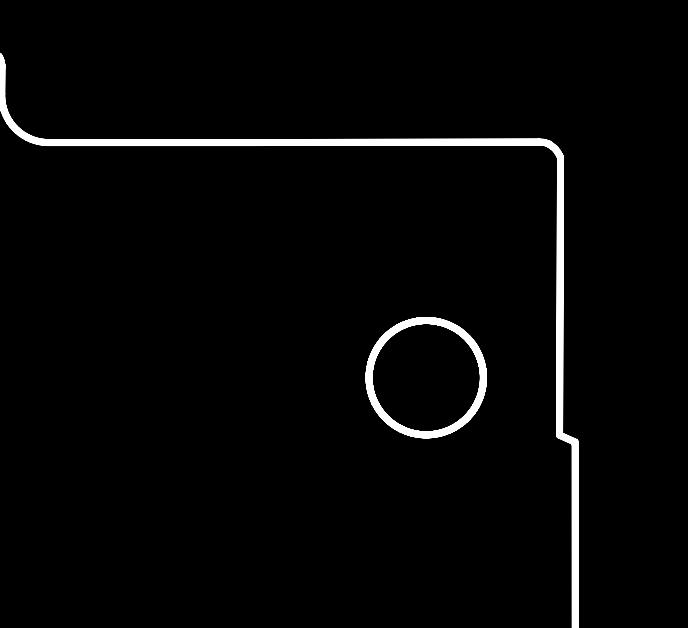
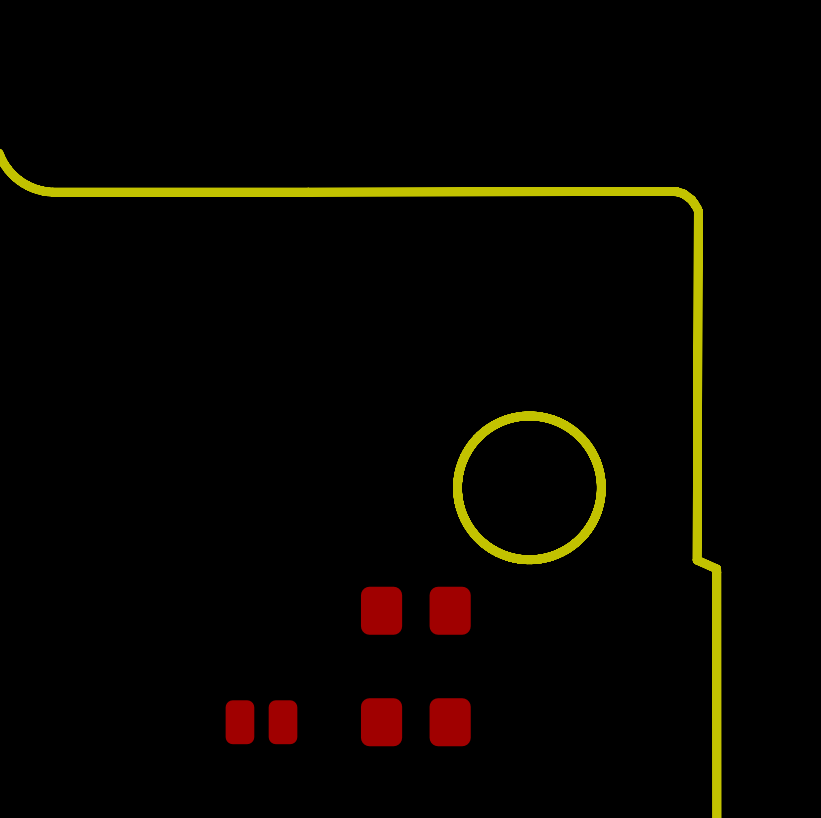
part: none -> (415, 610)
part: none -> (261, 722)
part: none -> (415, 722)

